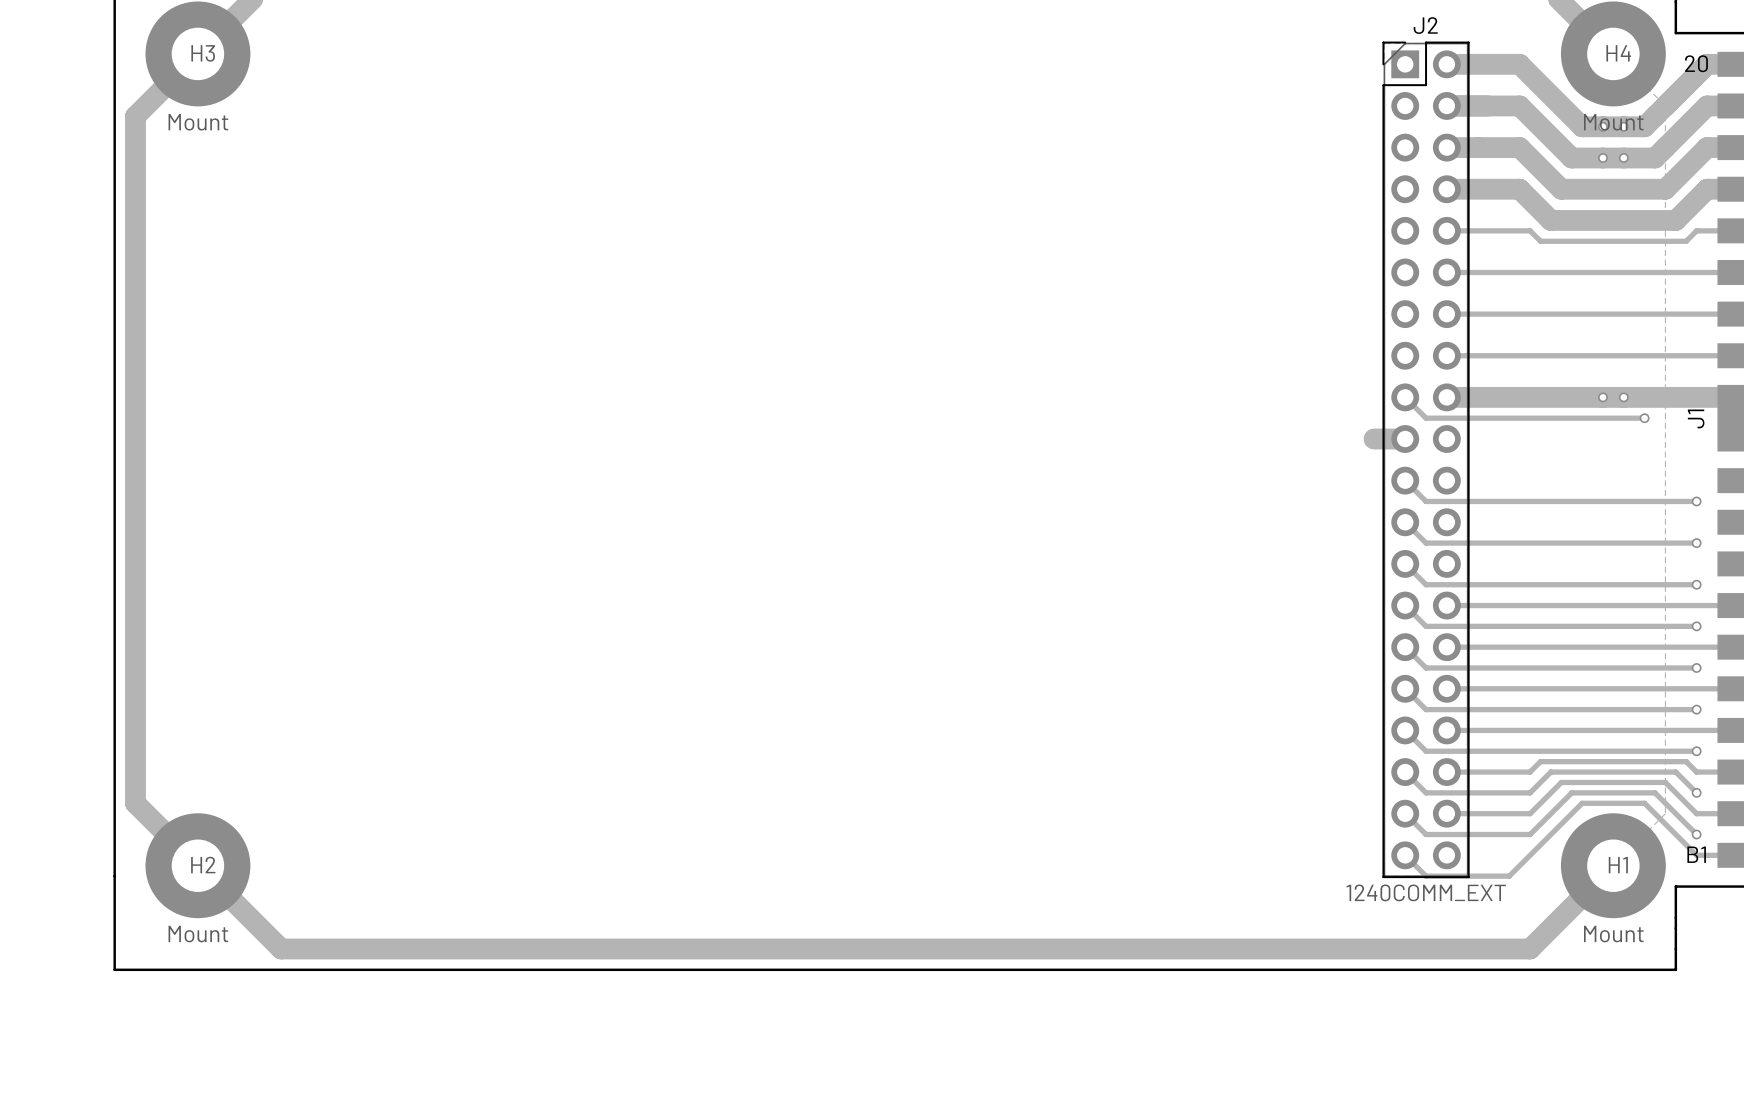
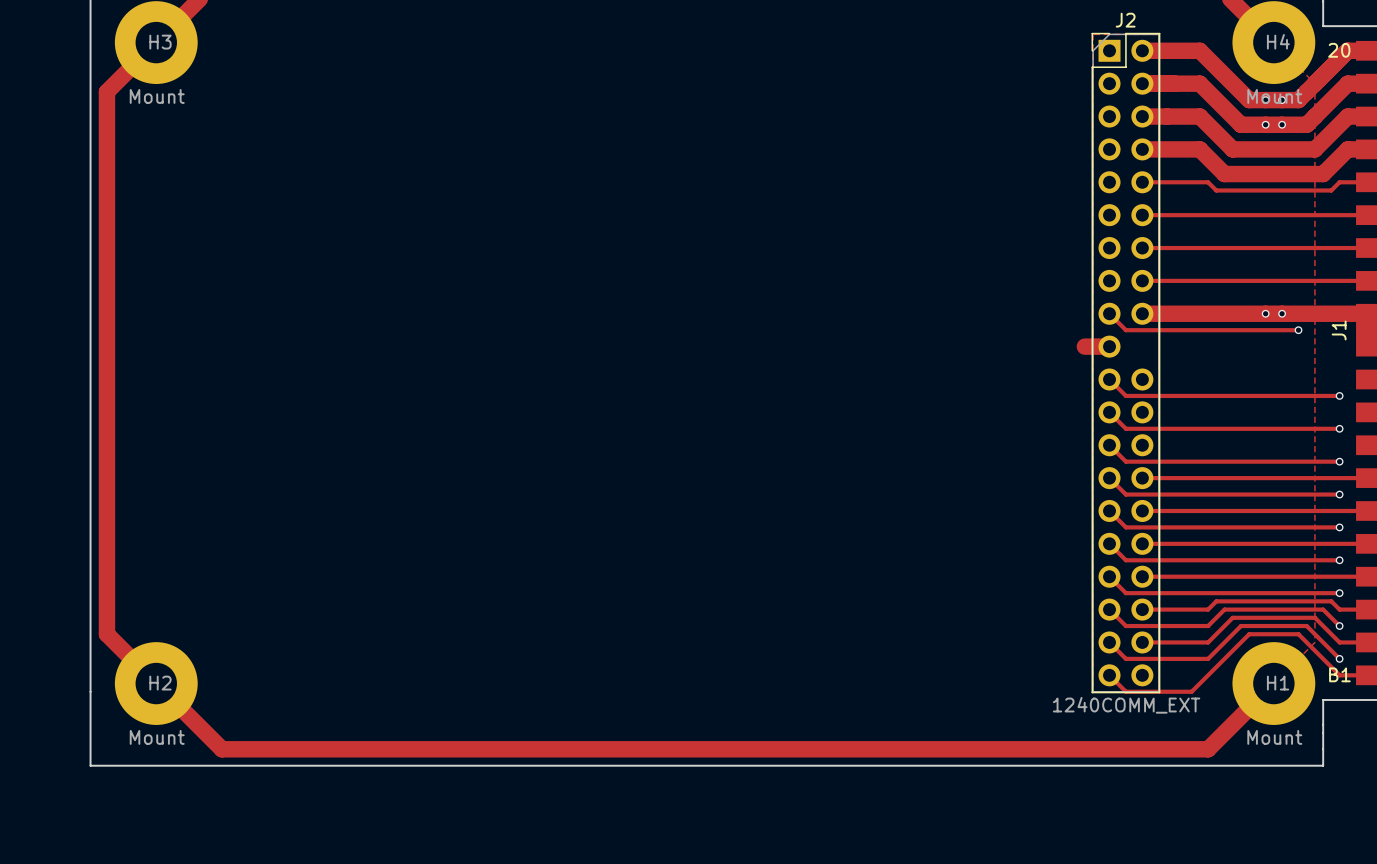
J2 footprint: [1382, 41, 1470, 879] -> [1091, 32, 1161, 694]

